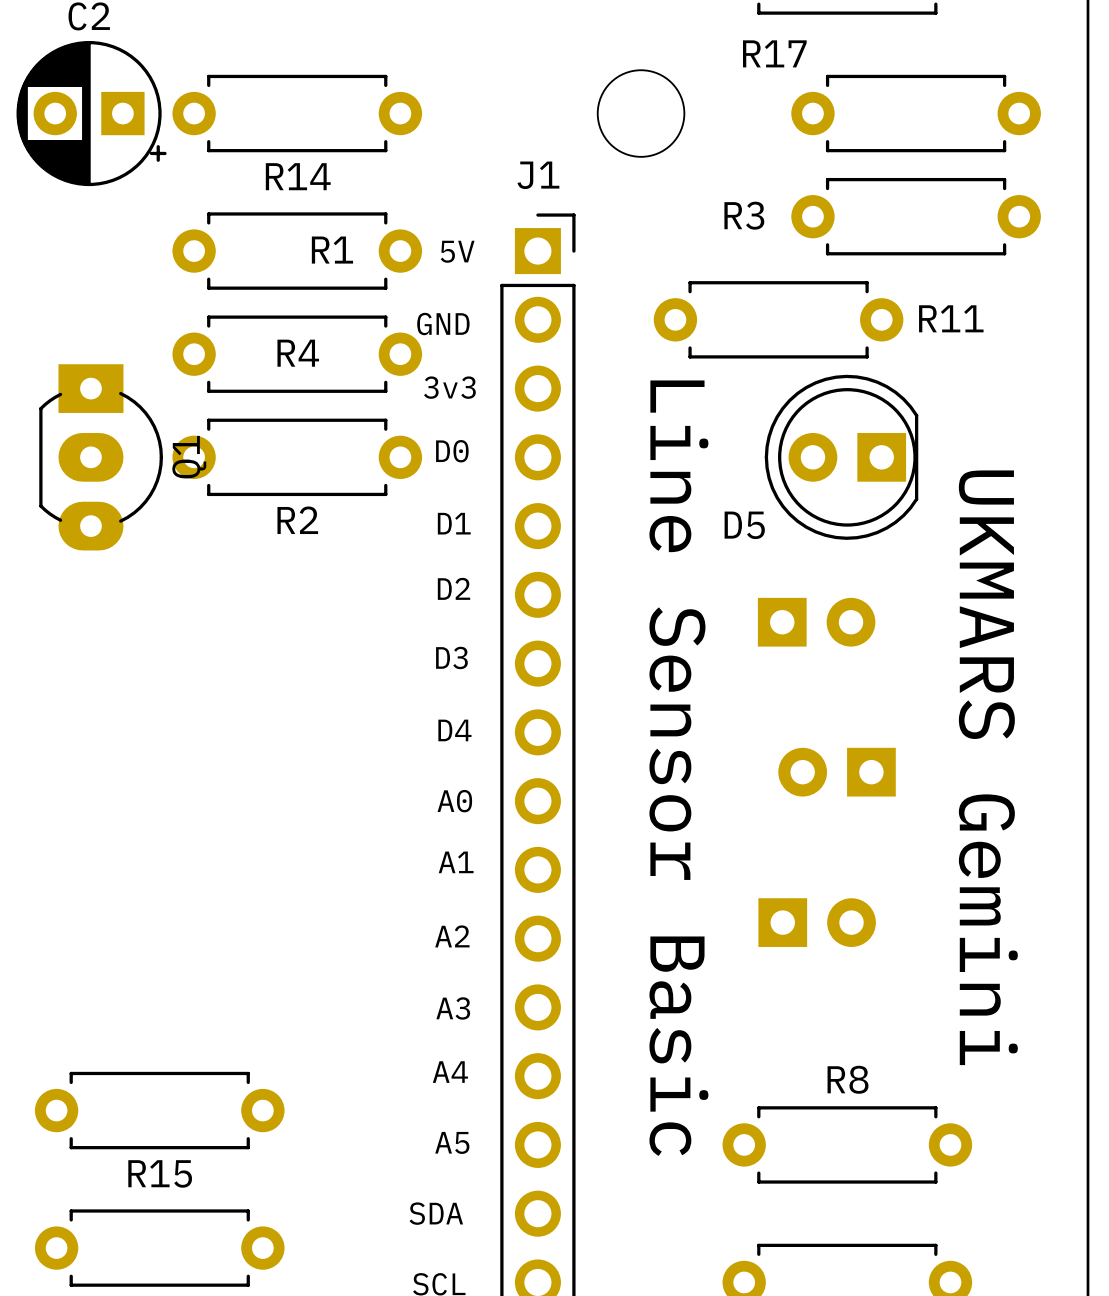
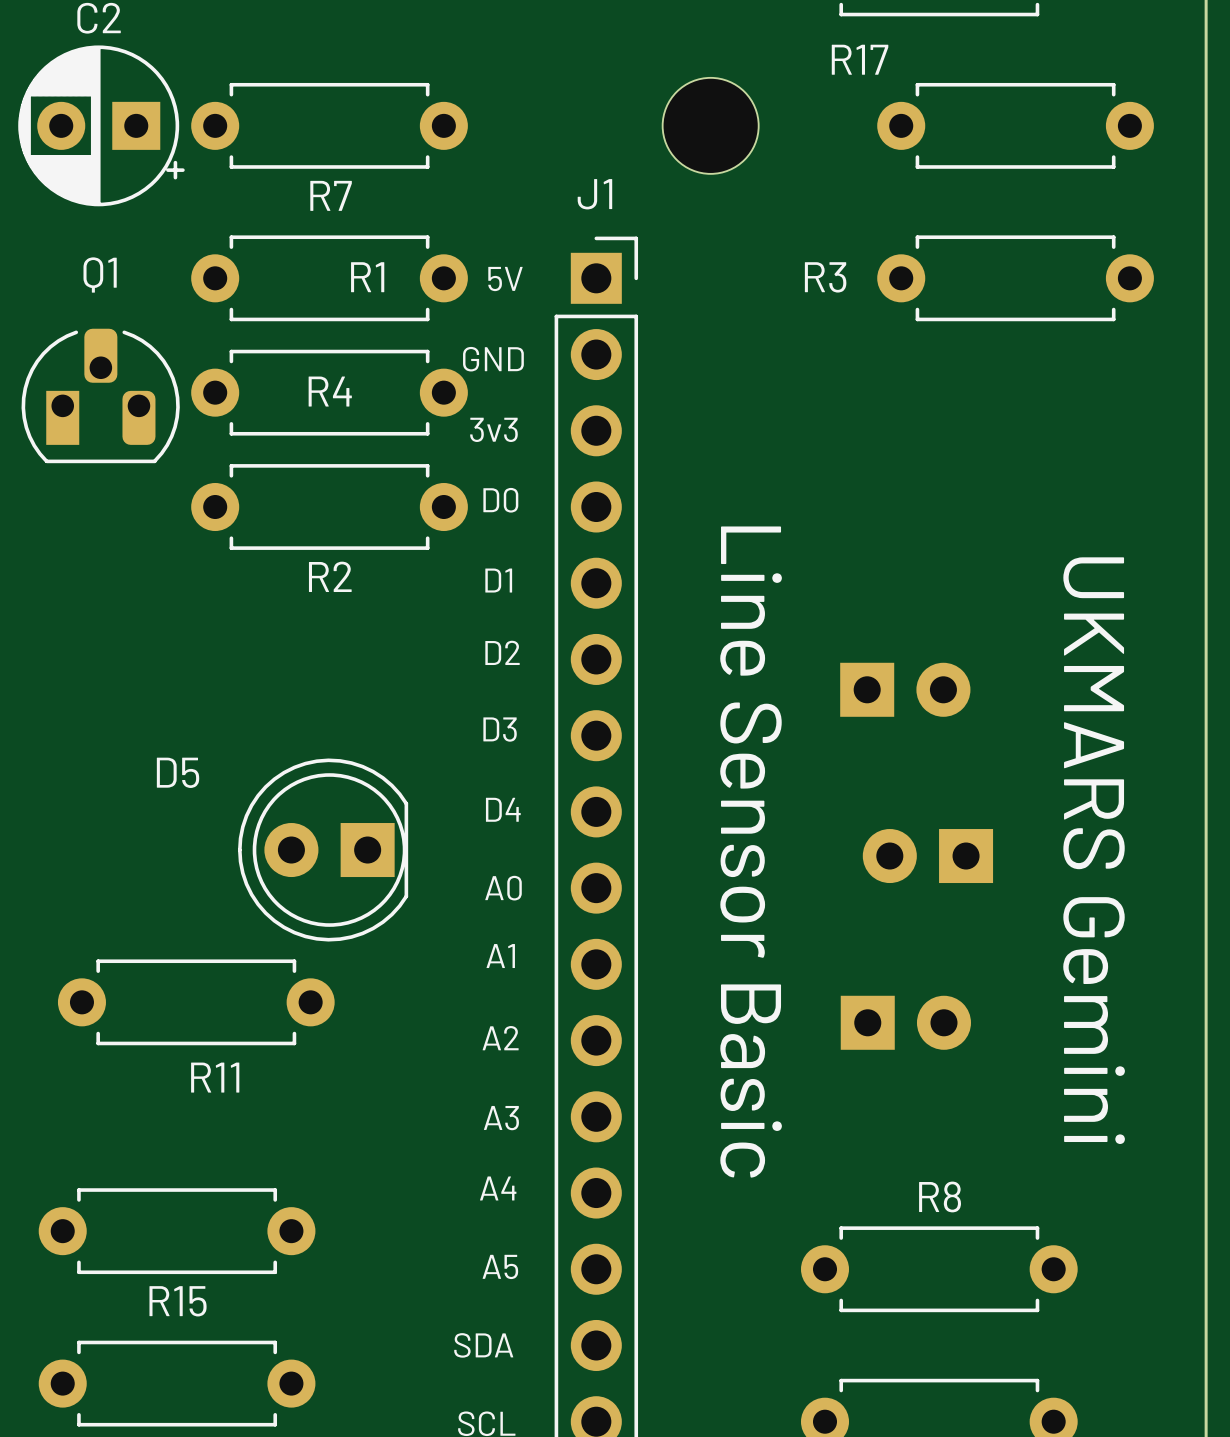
R14 name: R14 (298, 176) -> R7 (331, 195)
R3 position: (916, 216) -> (1015, 278)
R11 name position: R11 (951, 318) -> R11 (215, 1077)
R11 position: (778, 319) -> (196, 1002)
Q1 footprint: [39, 364, 163, 551] -> [21, 328, 180, 464]
Q1 name position: Q1 (189, 457) -> Q1 (100, 274)
D5 position: (841, 457) -> (323, 850)
D5 name position: D5 (744, 525) -> D5 (178, 772)

